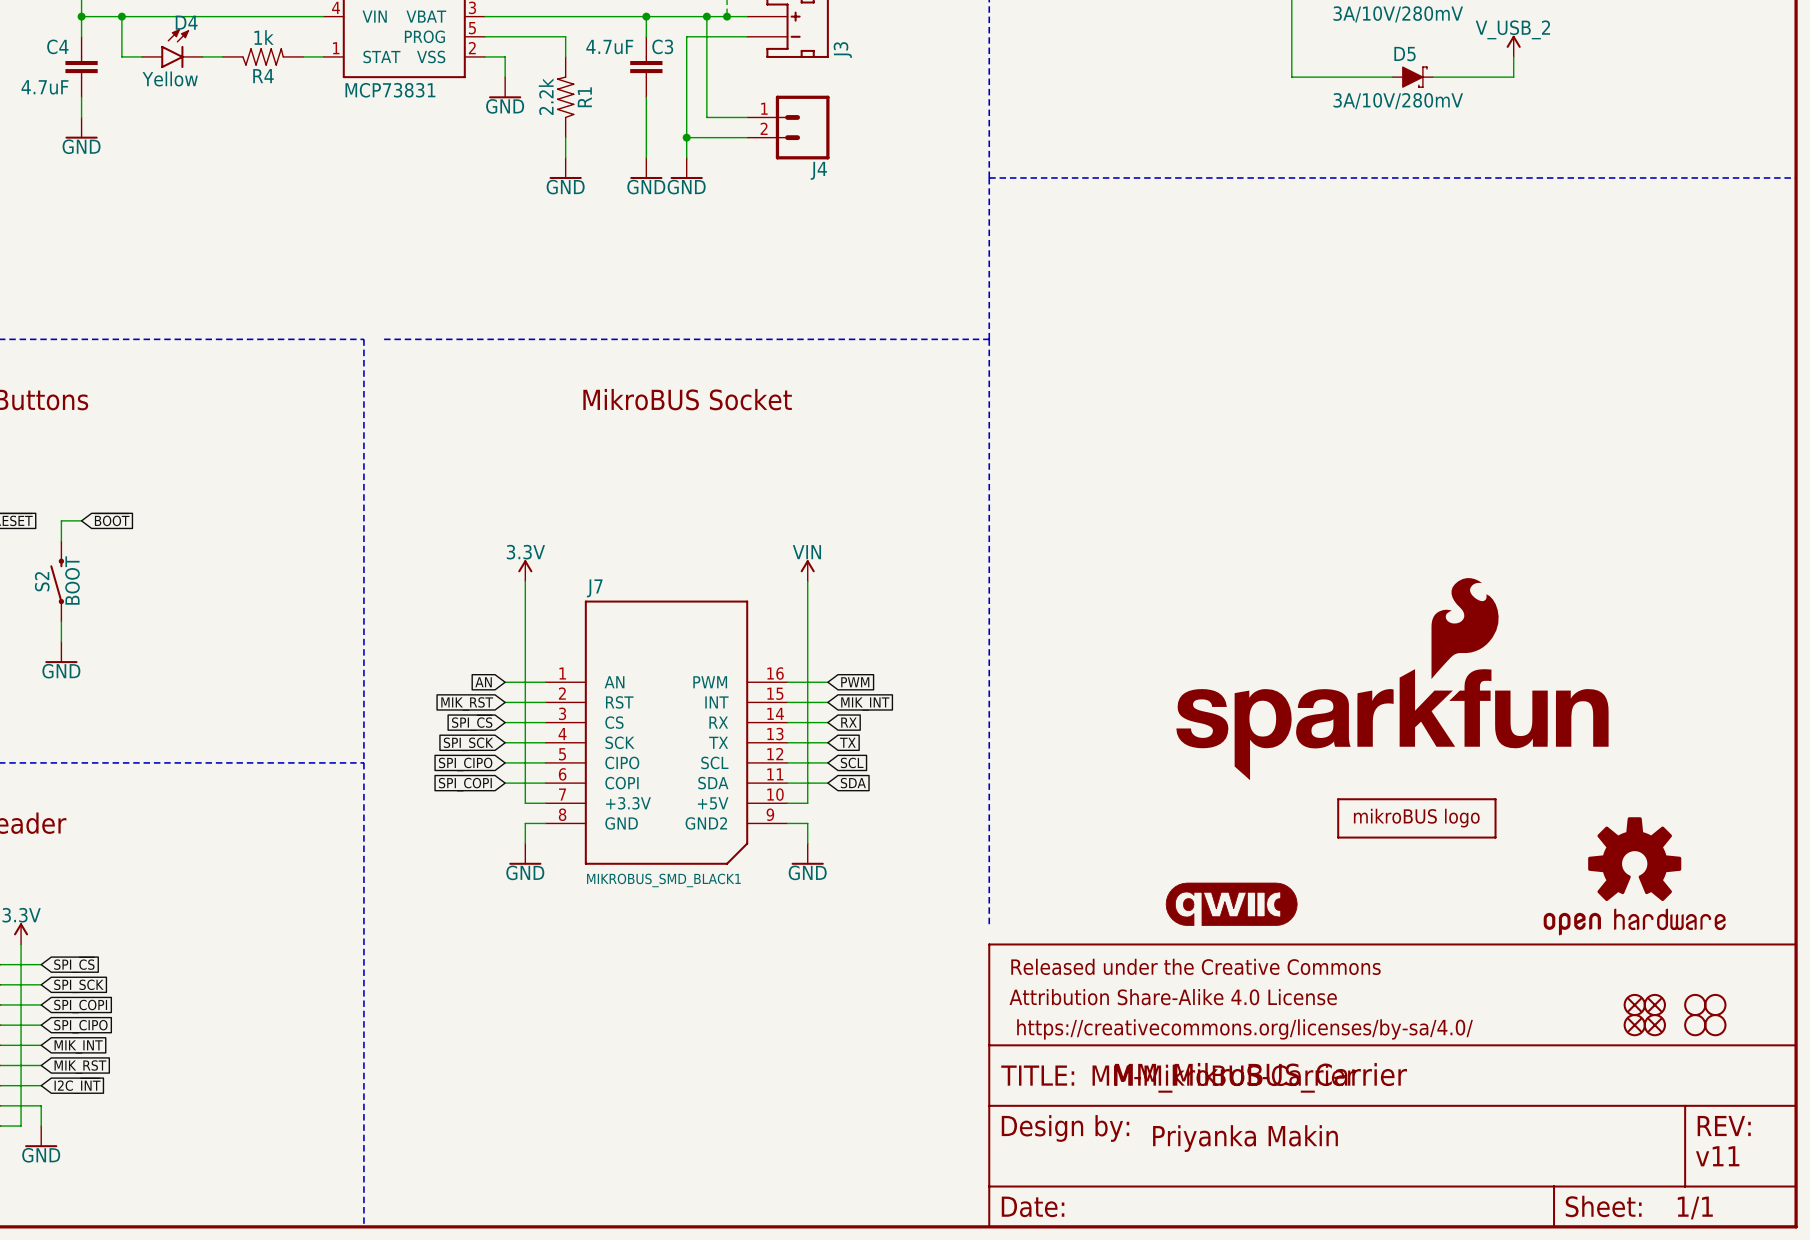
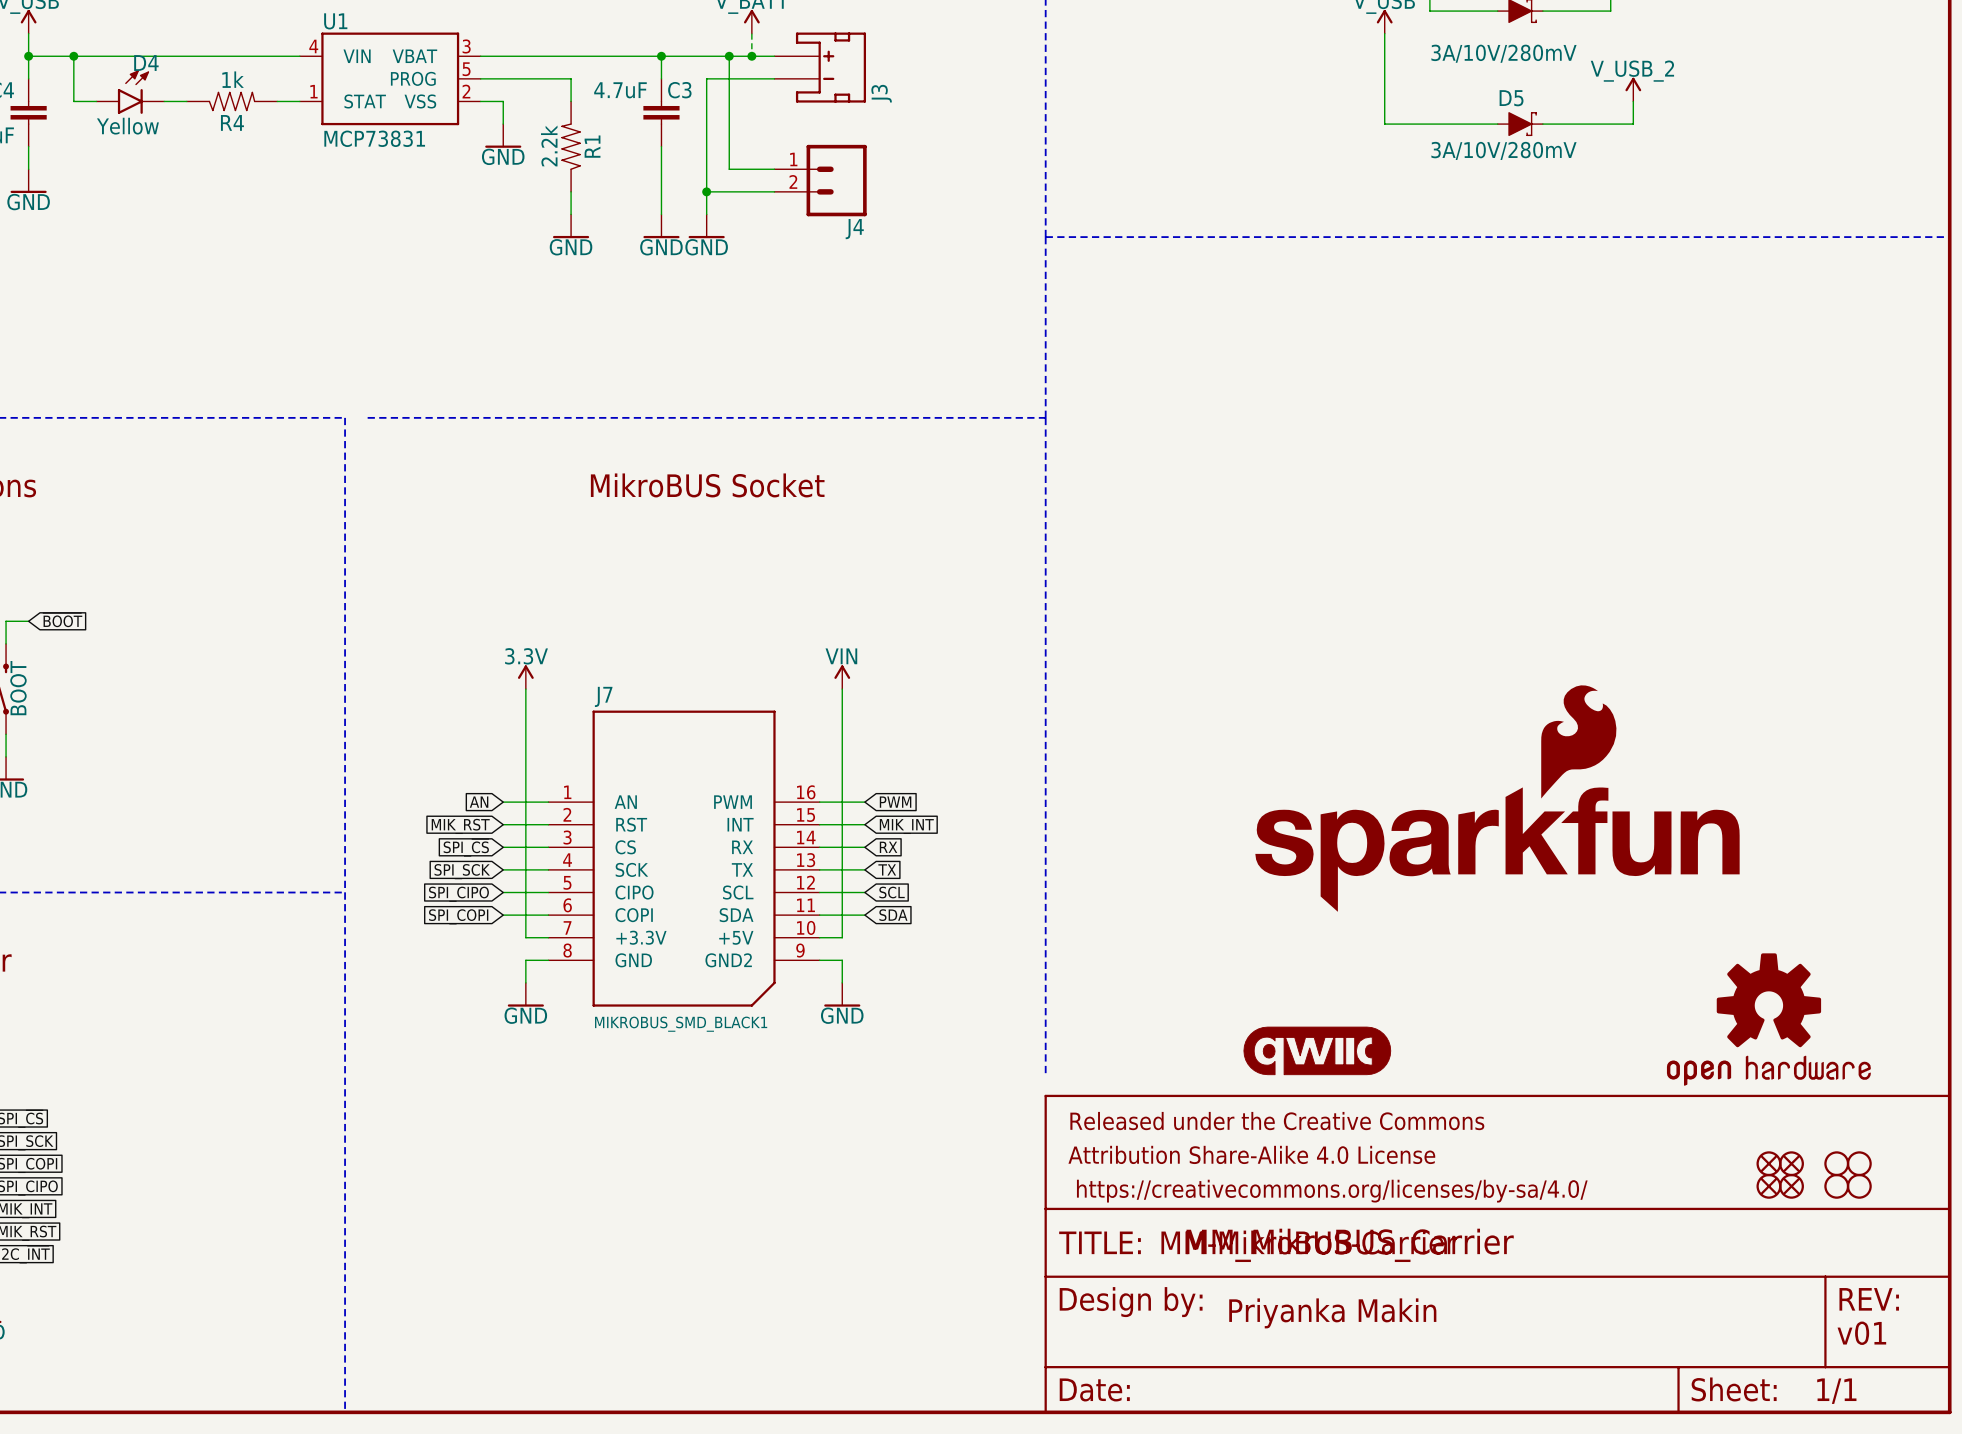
part: (1416, 818) -> none
text: v11 (1717, 1156) -> v01 (1861, 1333)

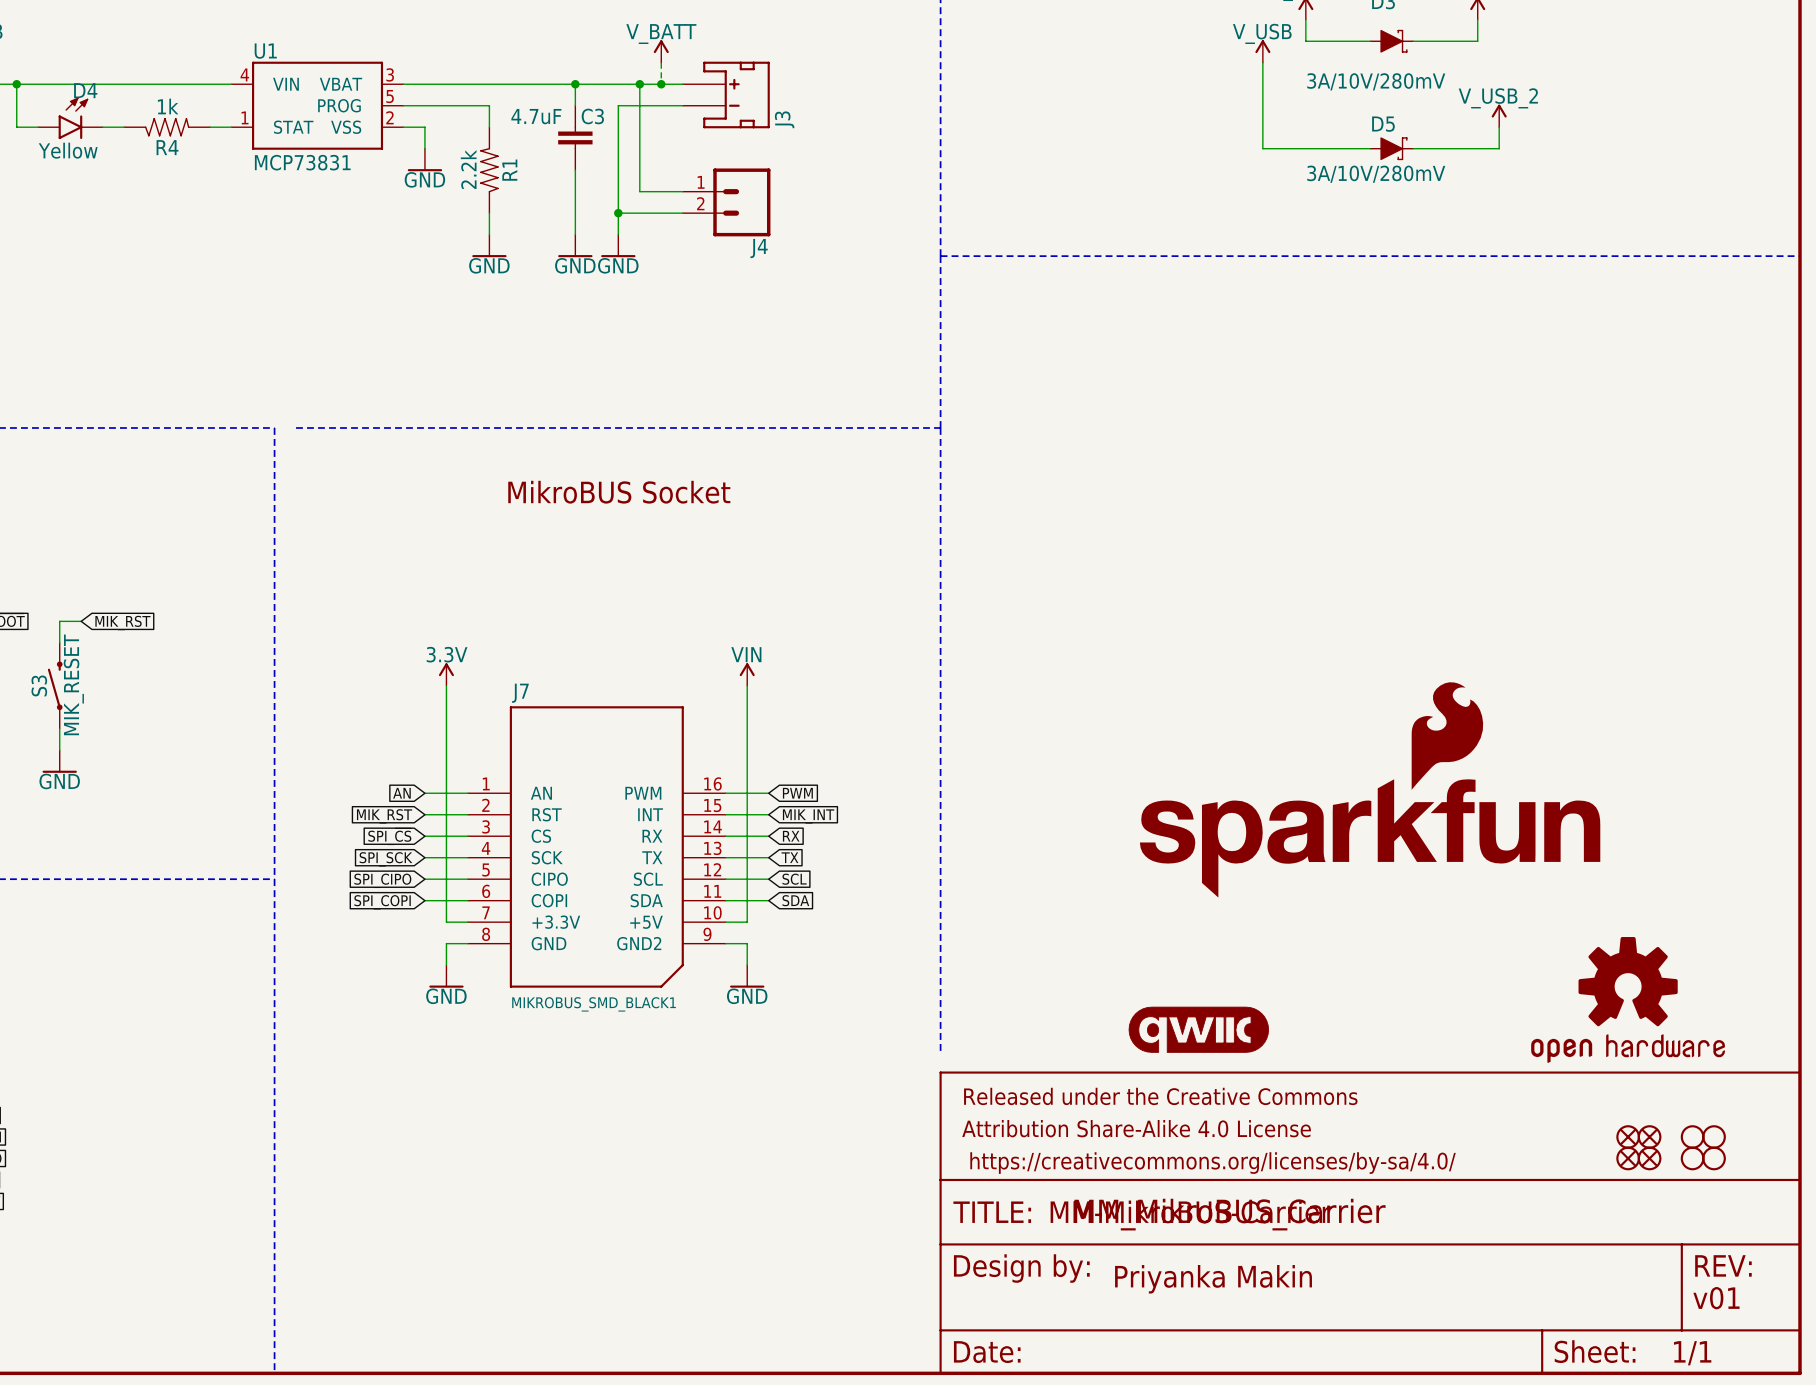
wire: none -> (81, 621) (59, 621) (59, 642)
global label: none -> MIK_RST (122, 623)
S3: none -> MIK_RESET (55, 685)
wire: none -> (59, 728) (59, 750)
power symbol: none -> GND (59, 761)

